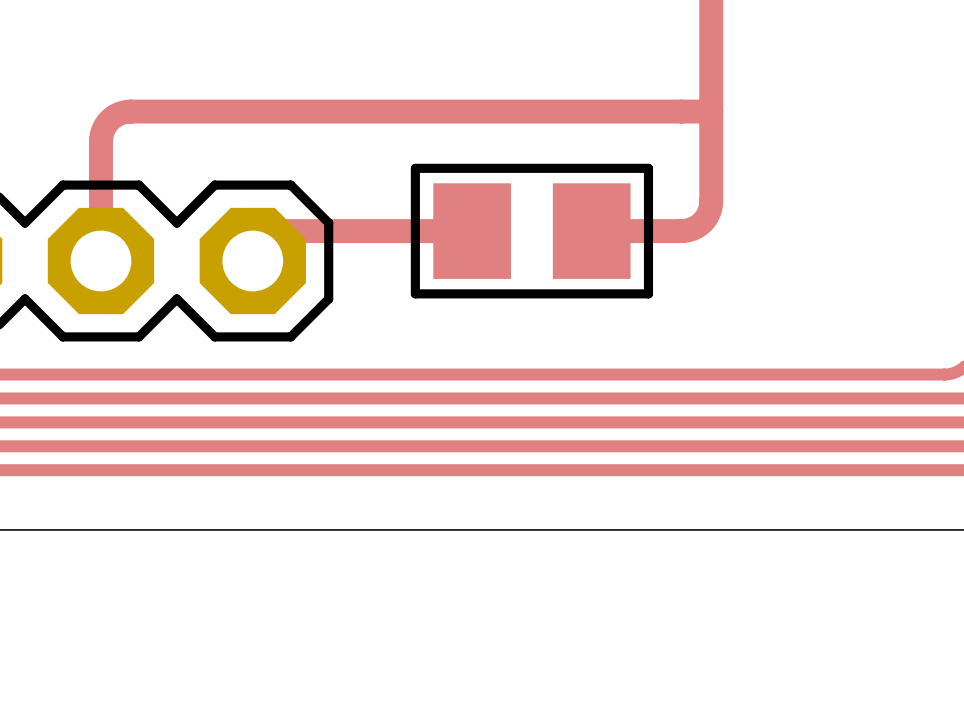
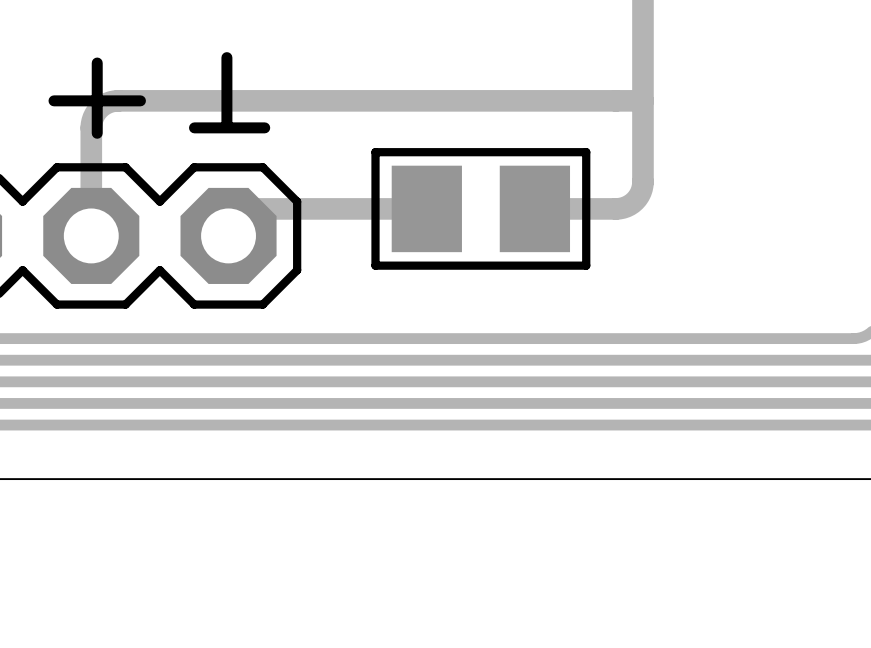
line: none -> (226, 57) (226, 122)
line: none -> (97, 63) (97, 133)
line: none -> (54, 100) (140, 100)
line: none -> (194, 127) (264, 127)

